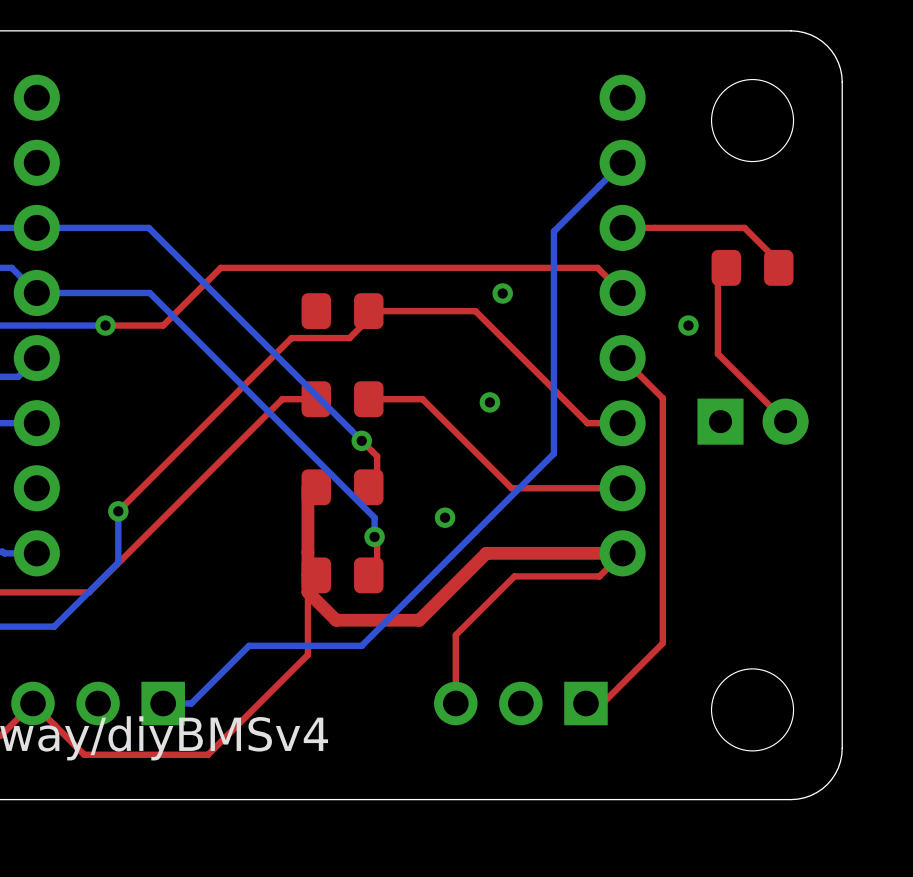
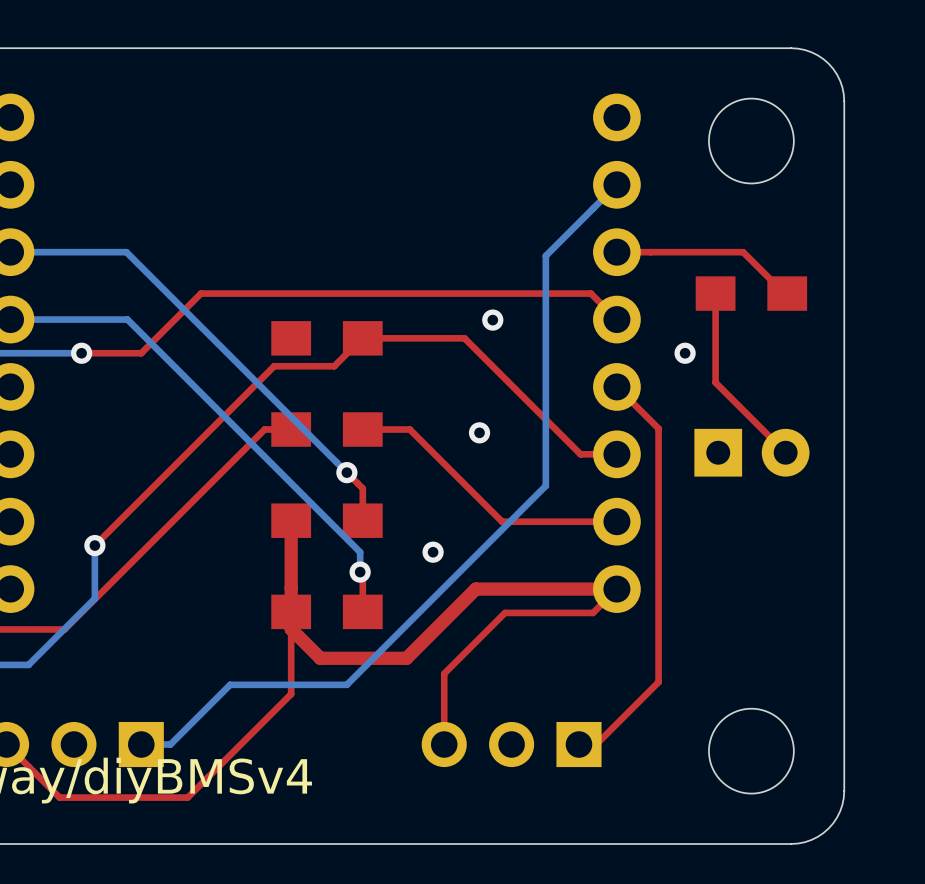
part footprint: [711, 249, 794, 286] -> [695, 276, 808, 311]
part footprint: [301, 293, 384, 330] -> [271, 321, 383, 356]
part footprint: [301, 381, 384, 418] -> [271, 412, 383, 447]
part footprint: [301, 469, 384, 506] -> [271, 503, 383, 538]
part footprint: [301, 557, 384, 594] -> [271, 594, 383, 630]

